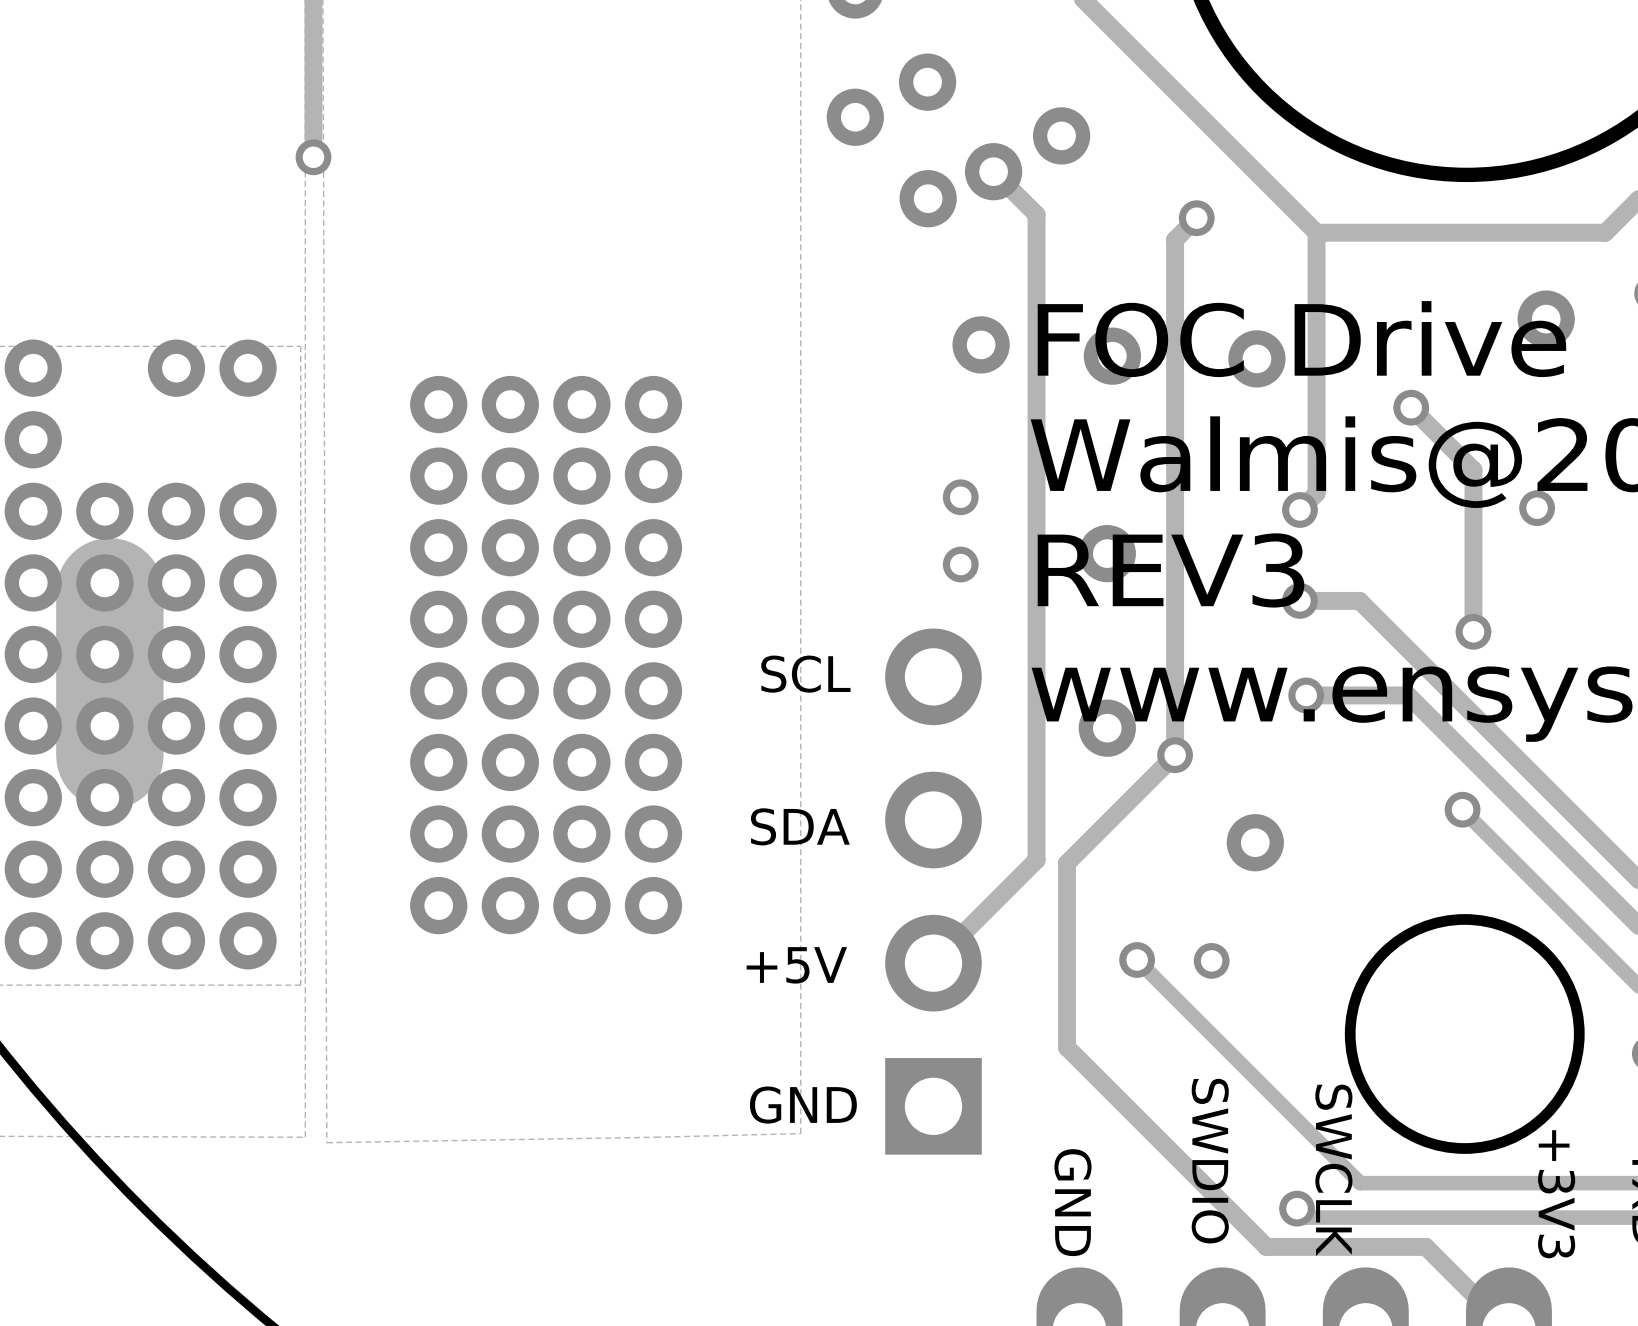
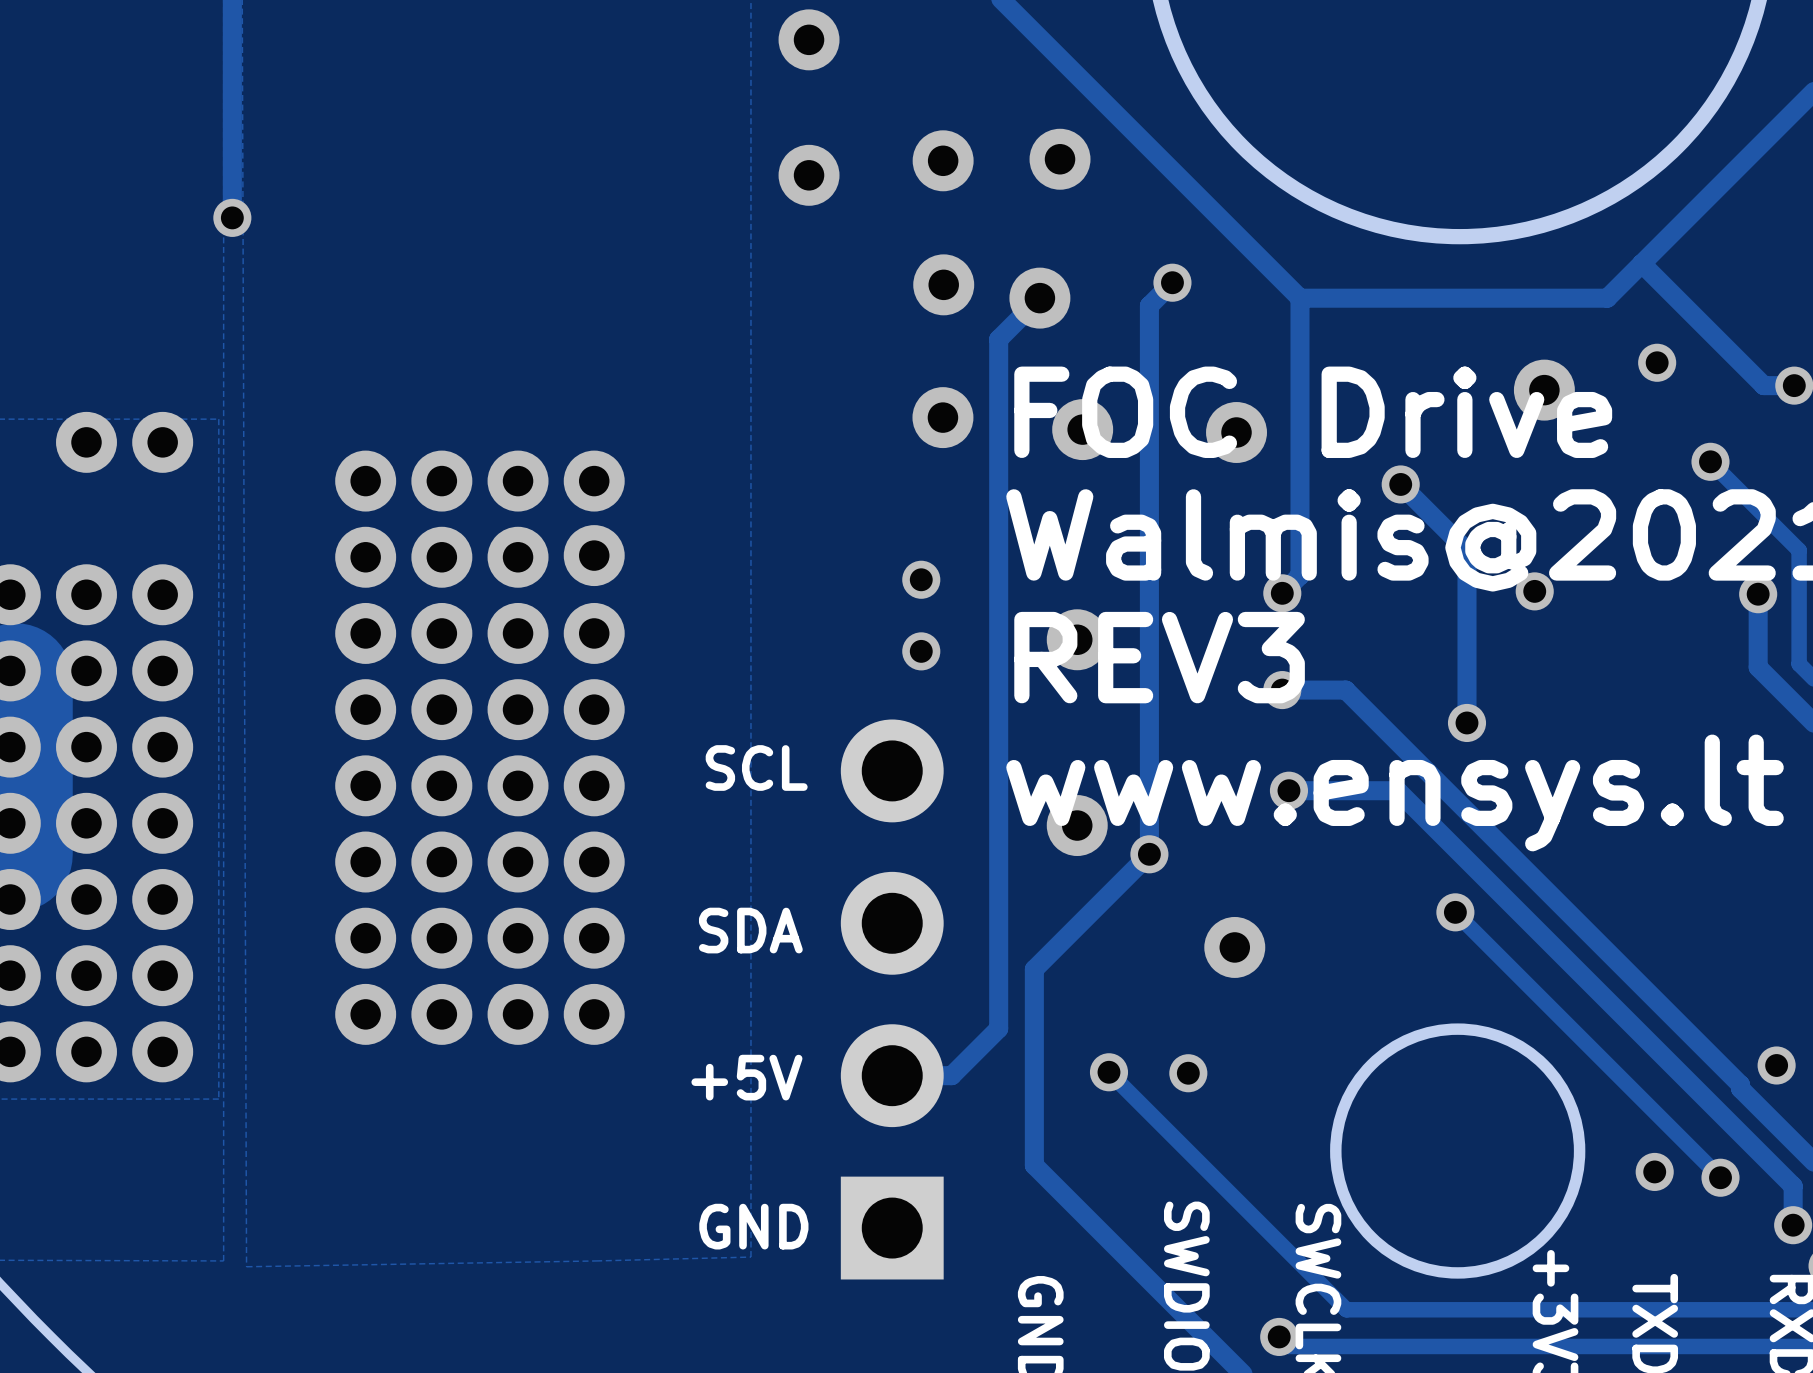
via position: (927, 82) -> (943, 160)
via position: (1061, 135) -> (1060, 159)
track: (993, 171) (1036, 214) (1036, 860) (933, 963) -> (1039, 298) (998, 339) (998, 1028) (951, 1075) (892, 1075)
via: (993, 171) -> none
via: (928, 198) -> none
via: none -> (943, 284)
via: none -> (1039, 298)

